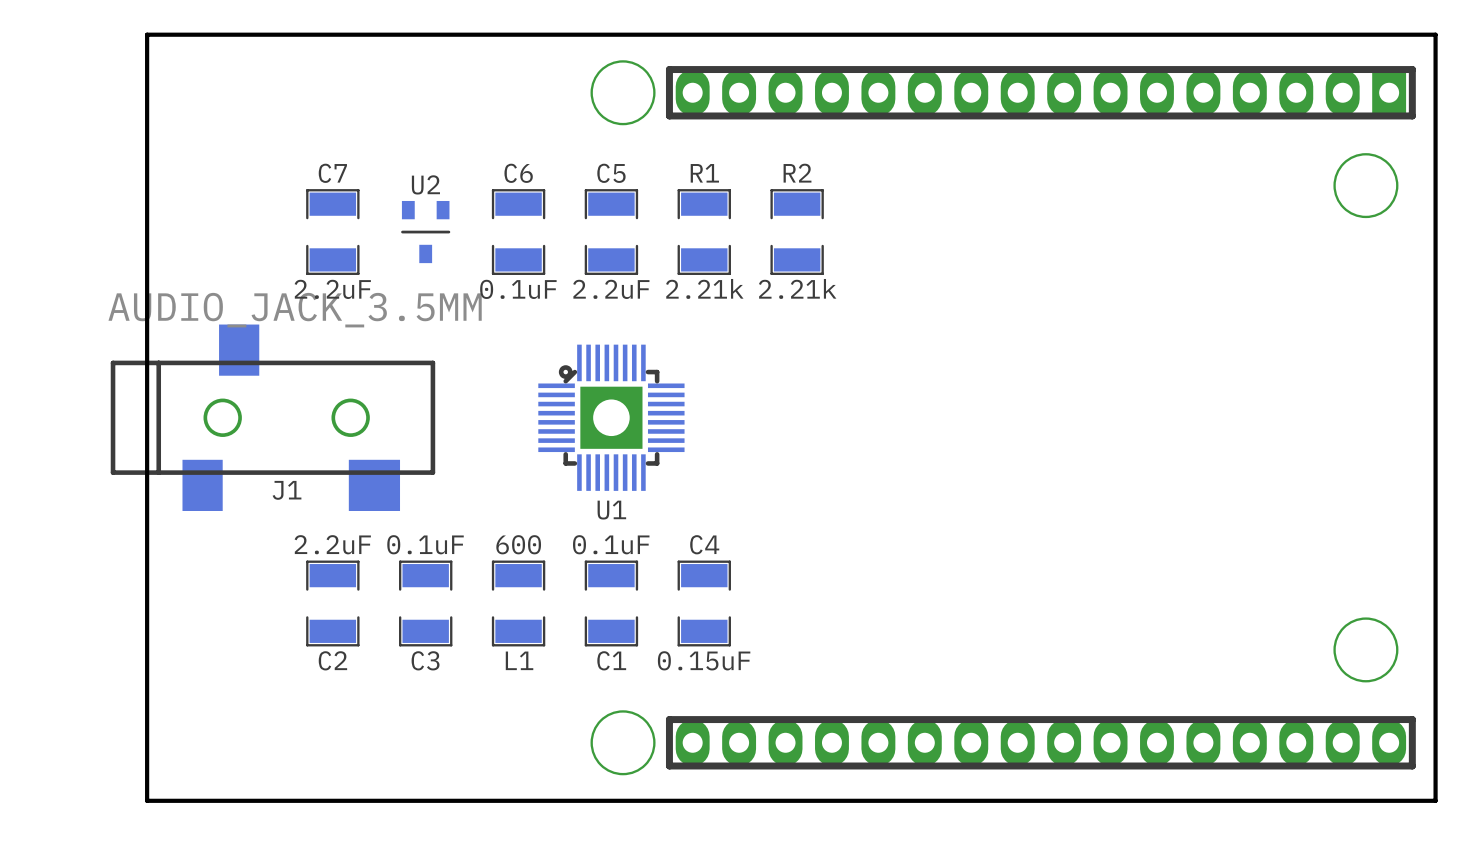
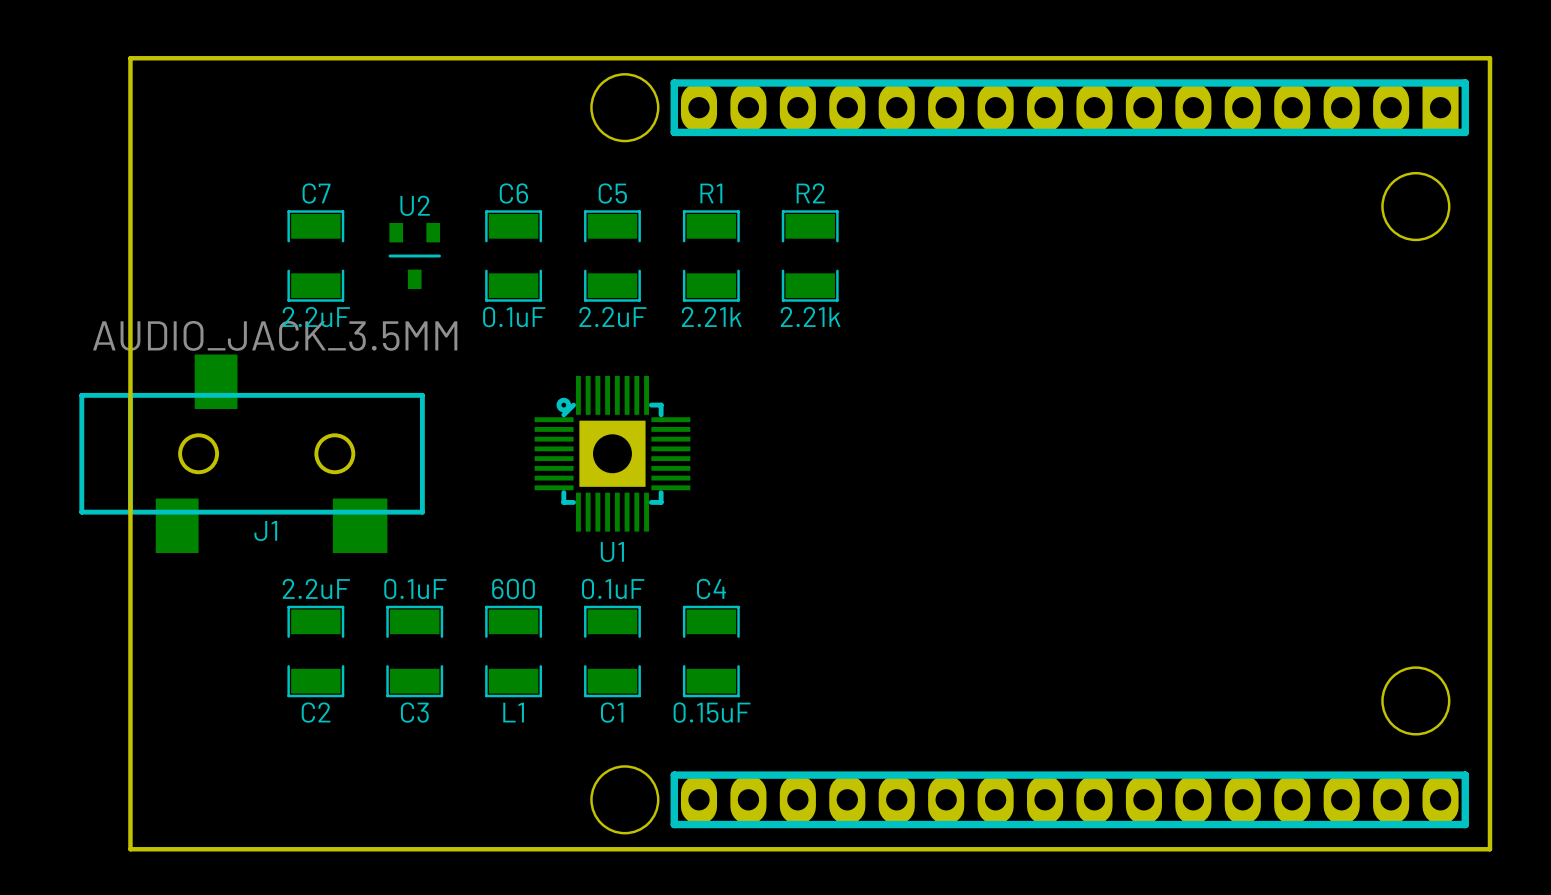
board edge: (1435, 46) (1435, 34) (147, 34) (147, 800) (1435, 800) (1435, 789) -> (1489, 58) (130, 58) (130, 849) (1489, 849)

